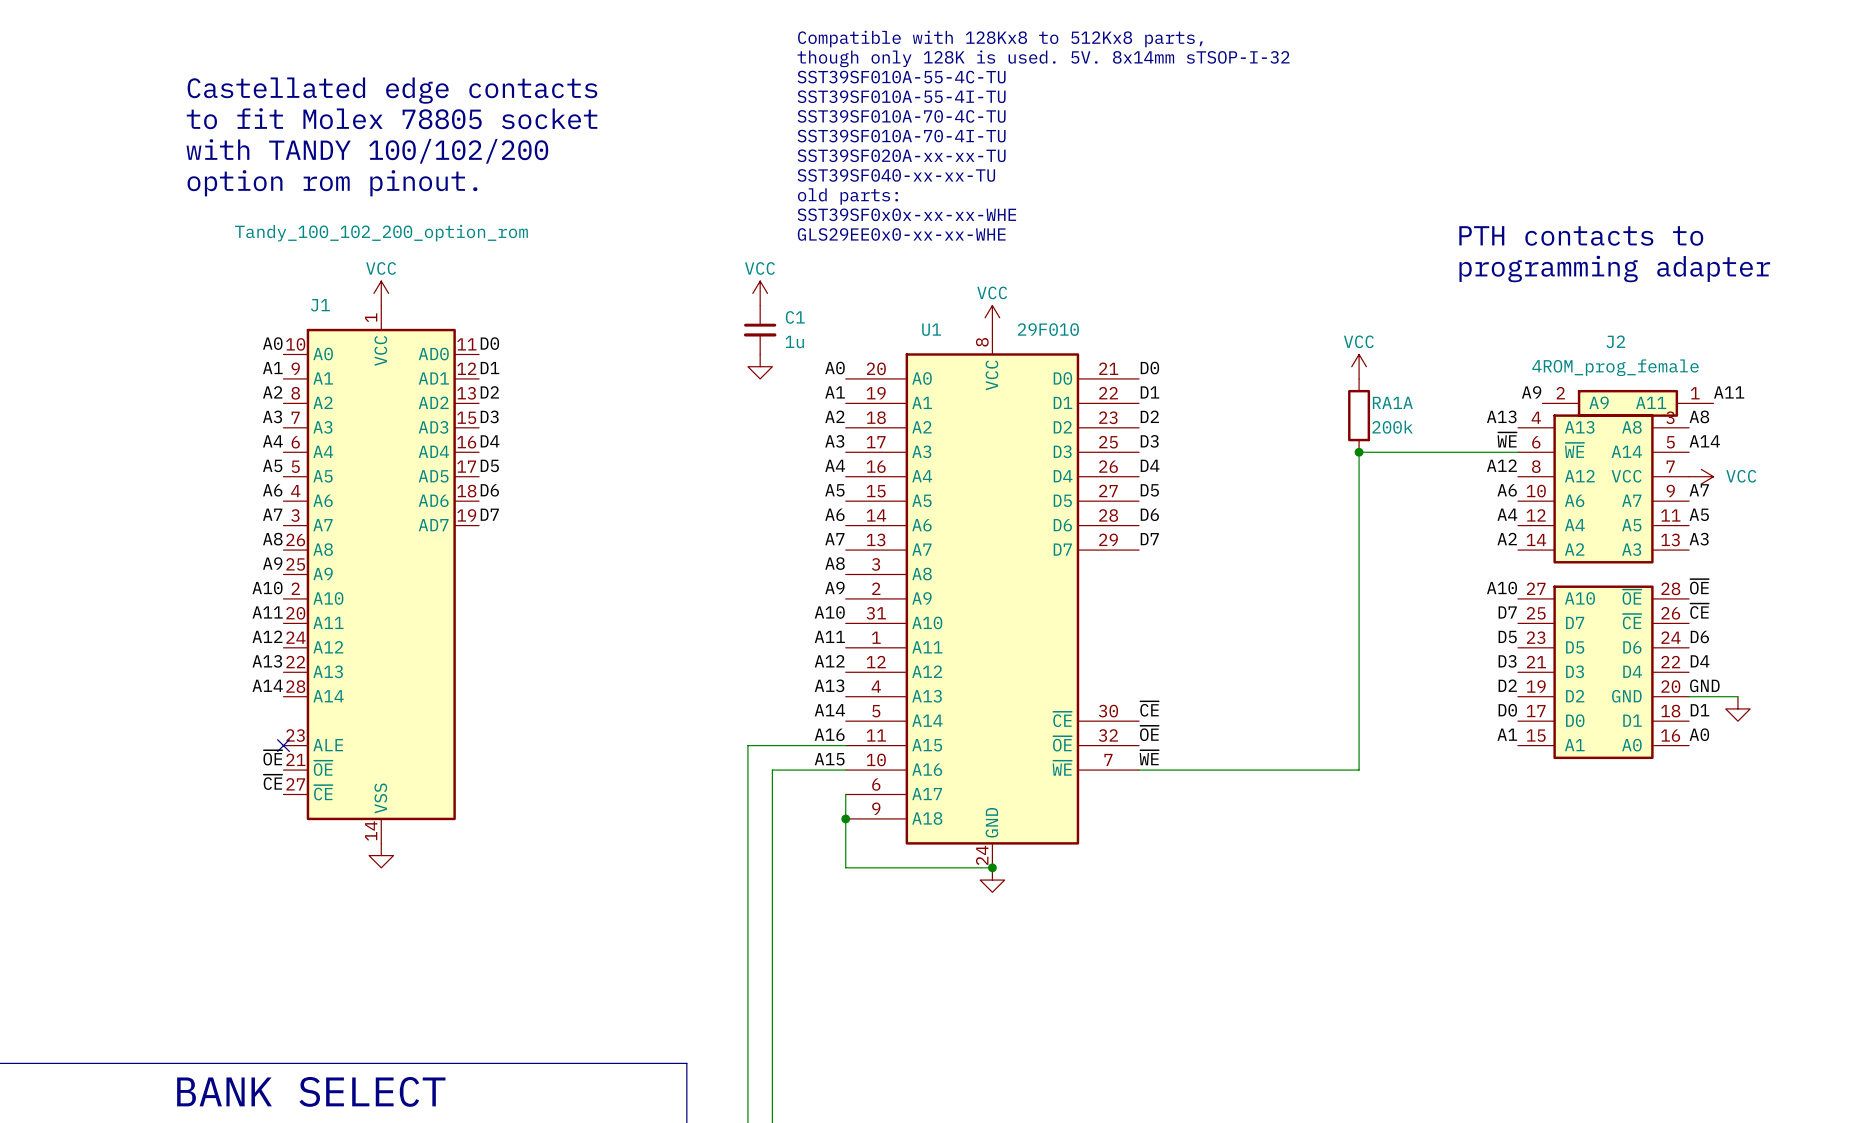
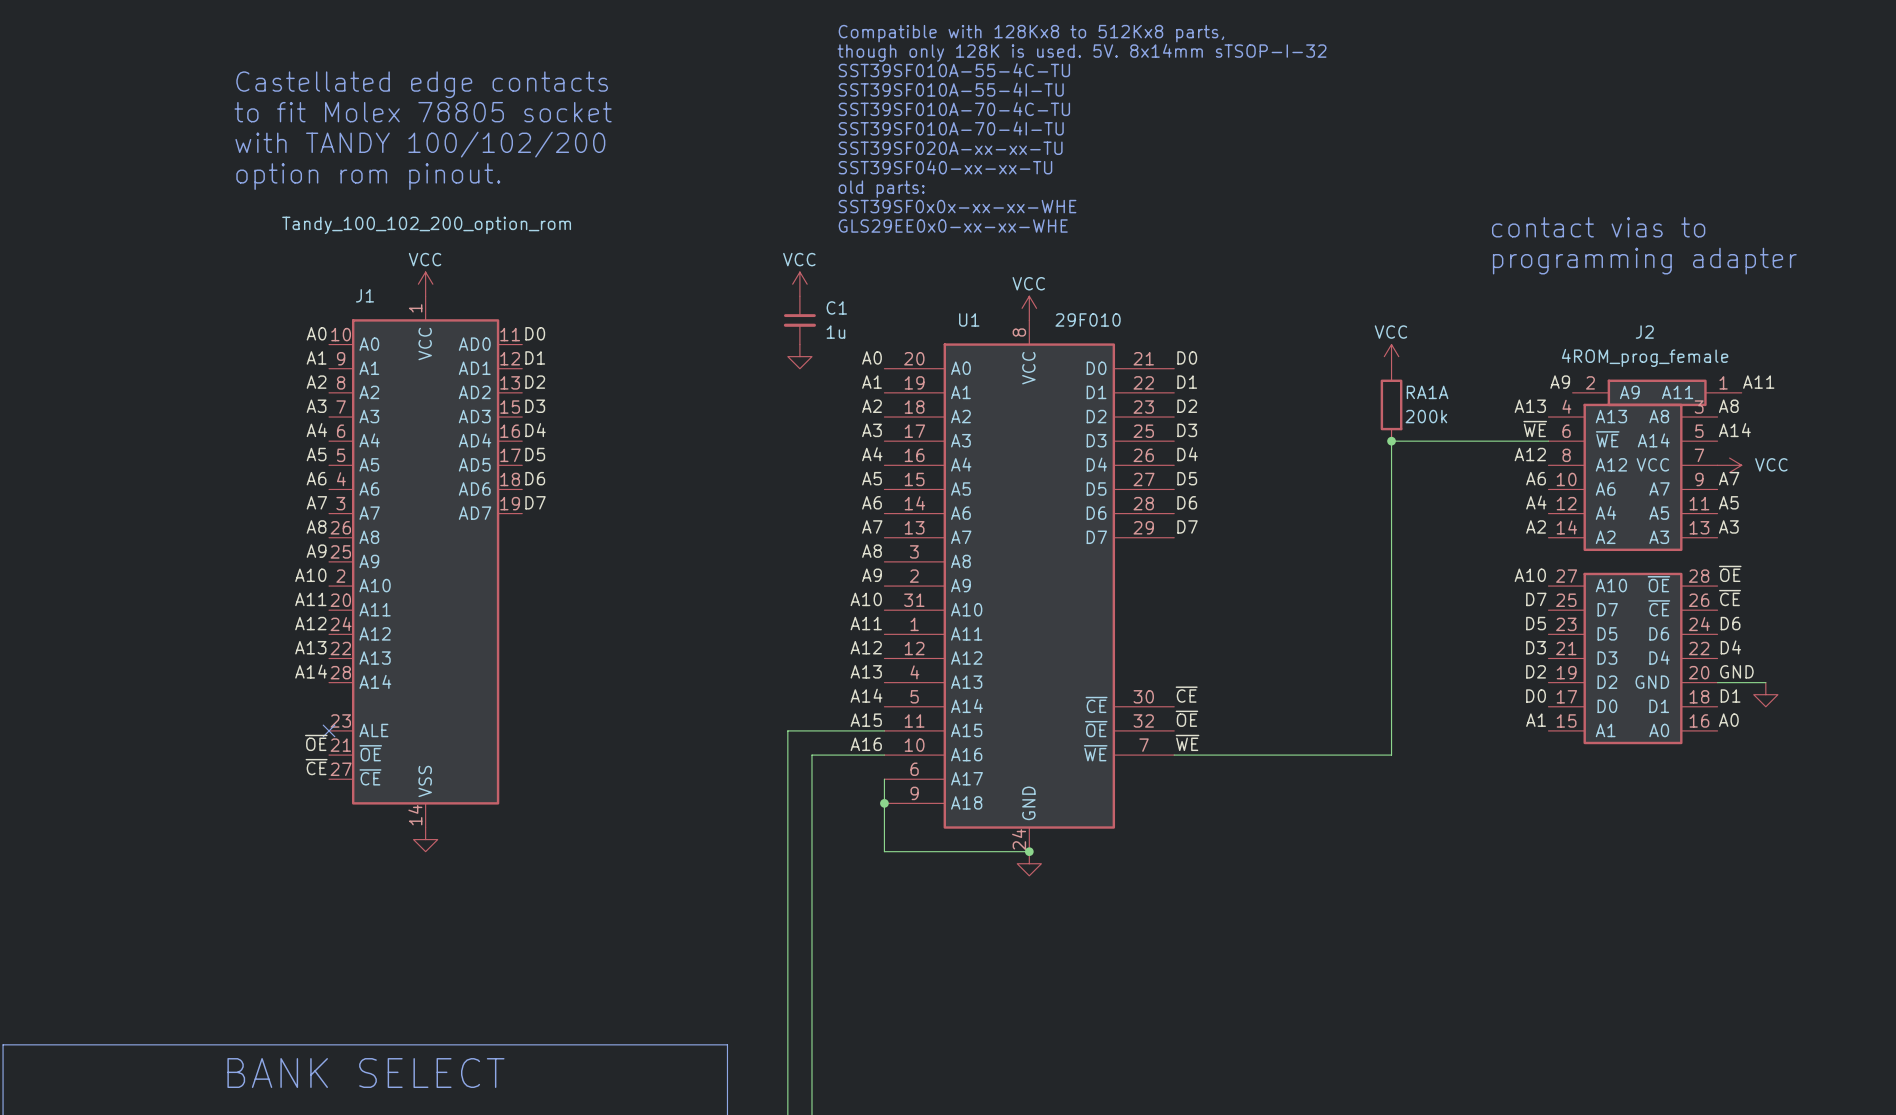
text: PTH contacts to (1581, 235) -> contact vias to (1598, 227)
label: A16 (829, 734) -> A15 (866, 720)
label: A15 (829, 759) -> A16 (866, 744)

